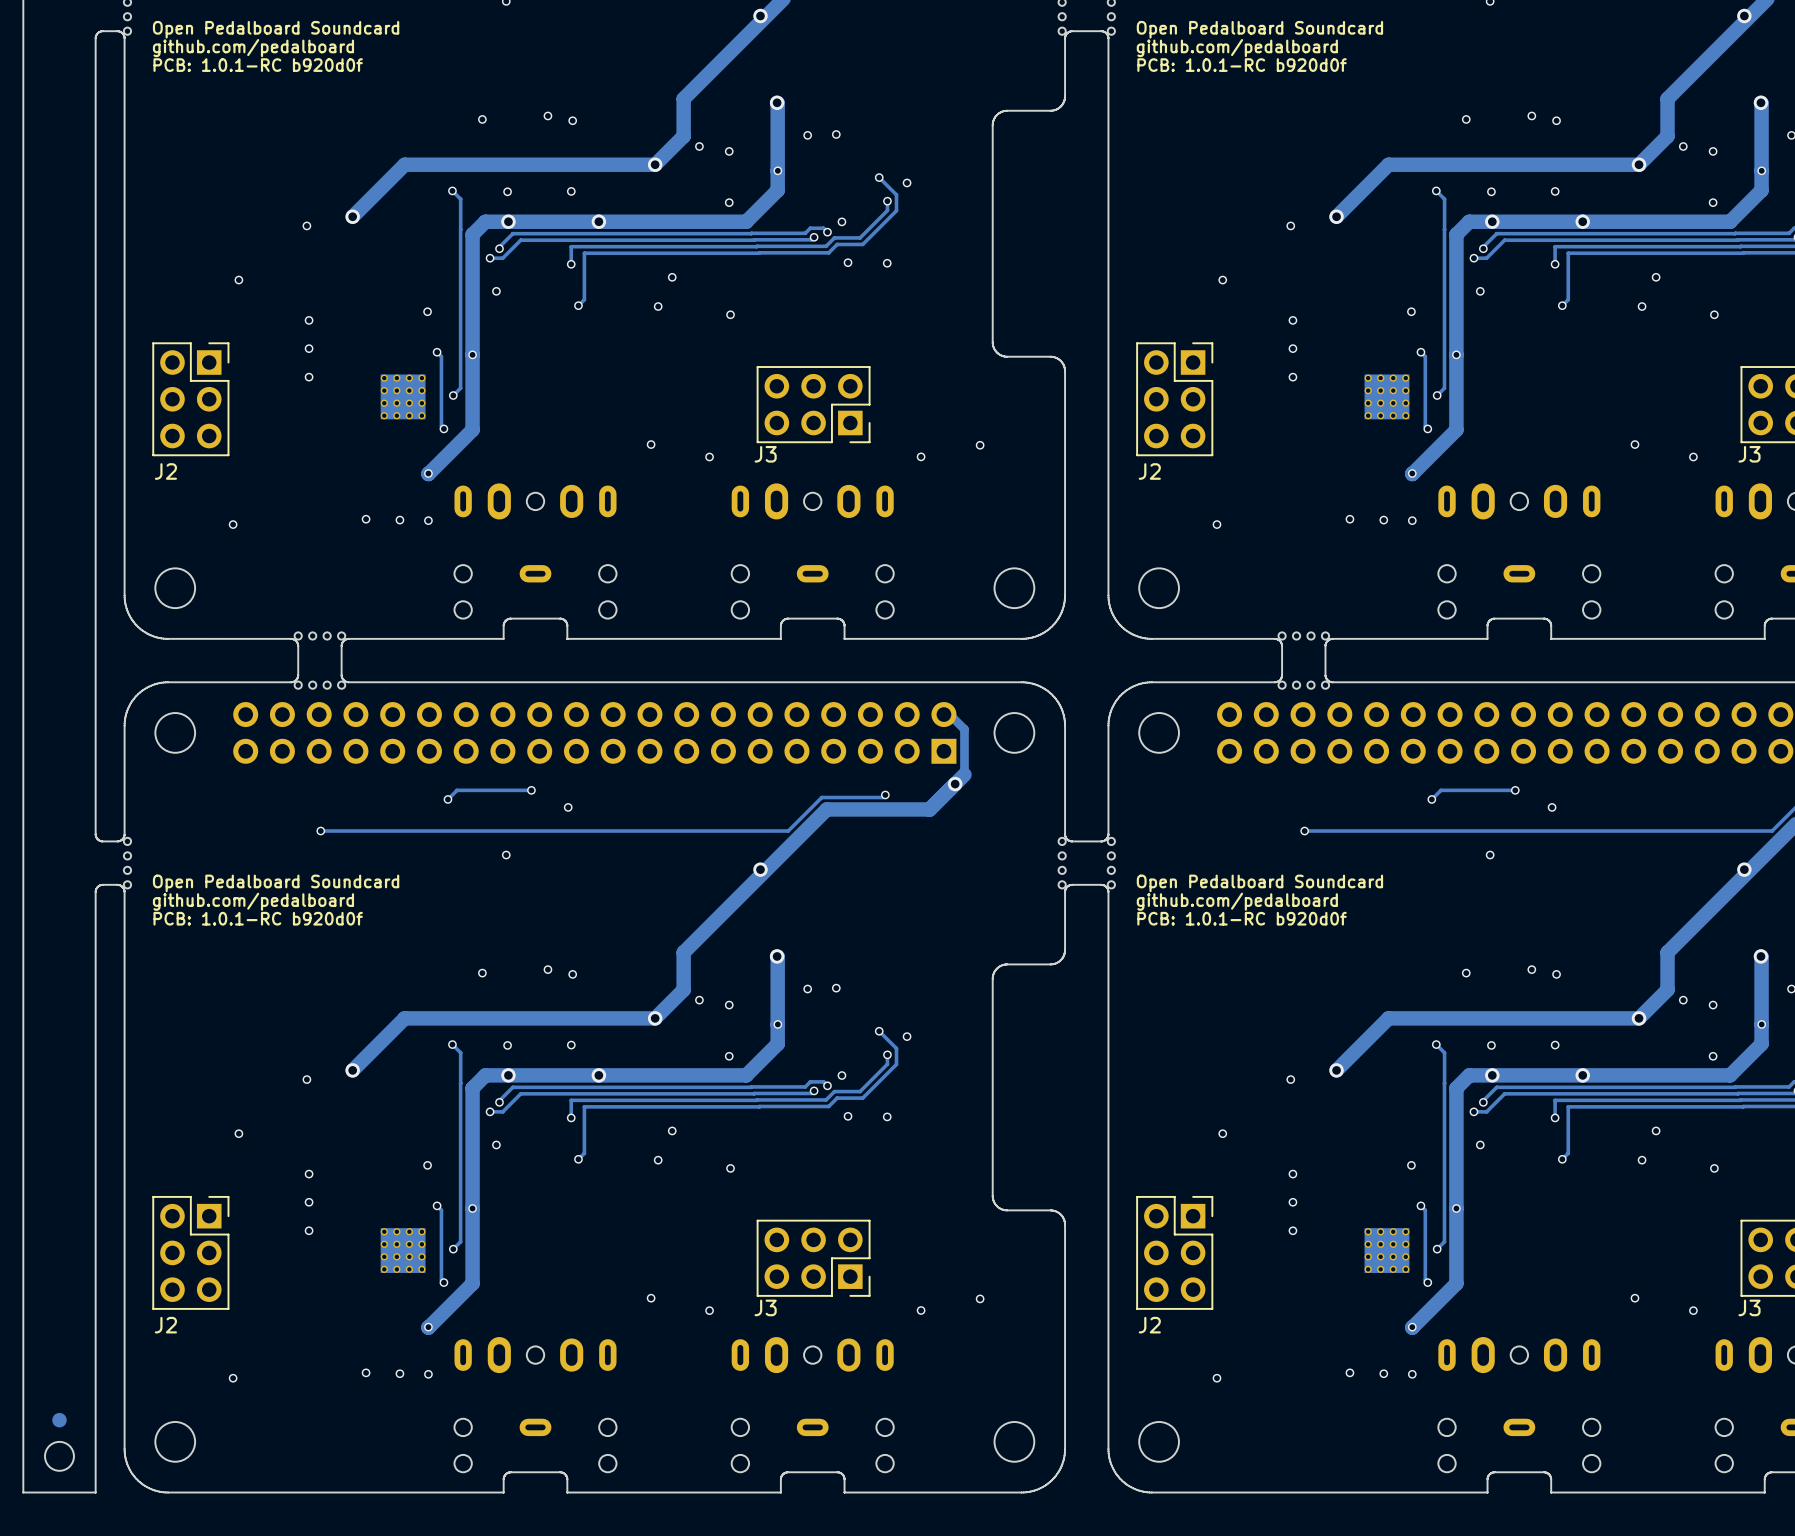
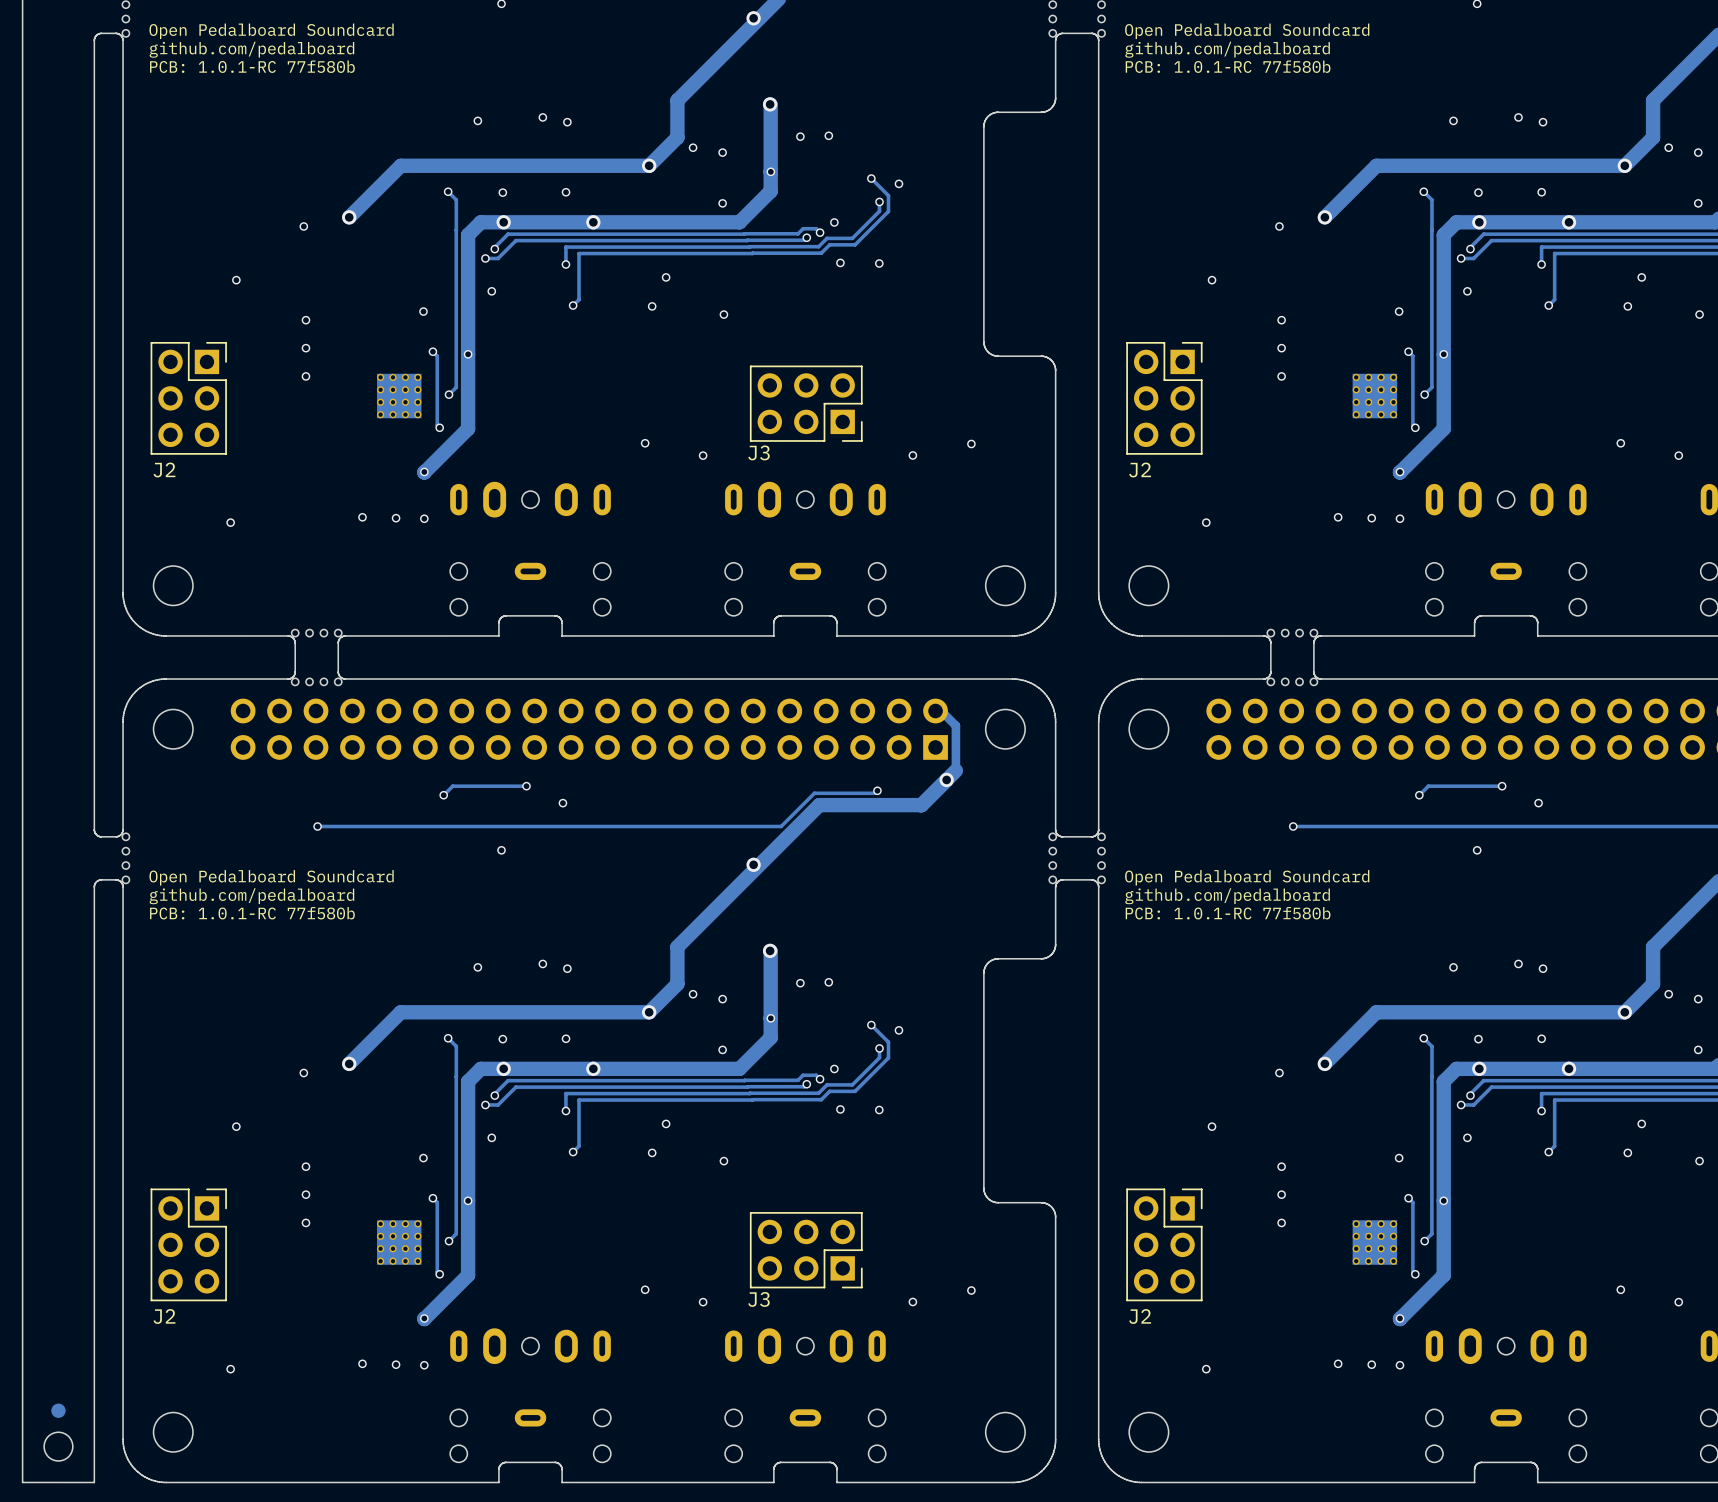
text: PCB: 1.0.1-RC b920d0f (258, 65) -> PCB: 1.0.1-RC 77f580b (252, 66)
text: PCB: 1.0.1-RC b920d0f (1242, 65) -> PCB: 1.0.1-RC 77f580b (1228, 66)
text: PCB: 1.0.1-RC b920d0f (258, 918) -> PCB: 1.0.1-RC 77f580b (252, 913)
text: PCB: 1.0.1-RC b920d0f (1242, 918) -> PCB: 1.0.1-RC 77f580b (1228, 913)

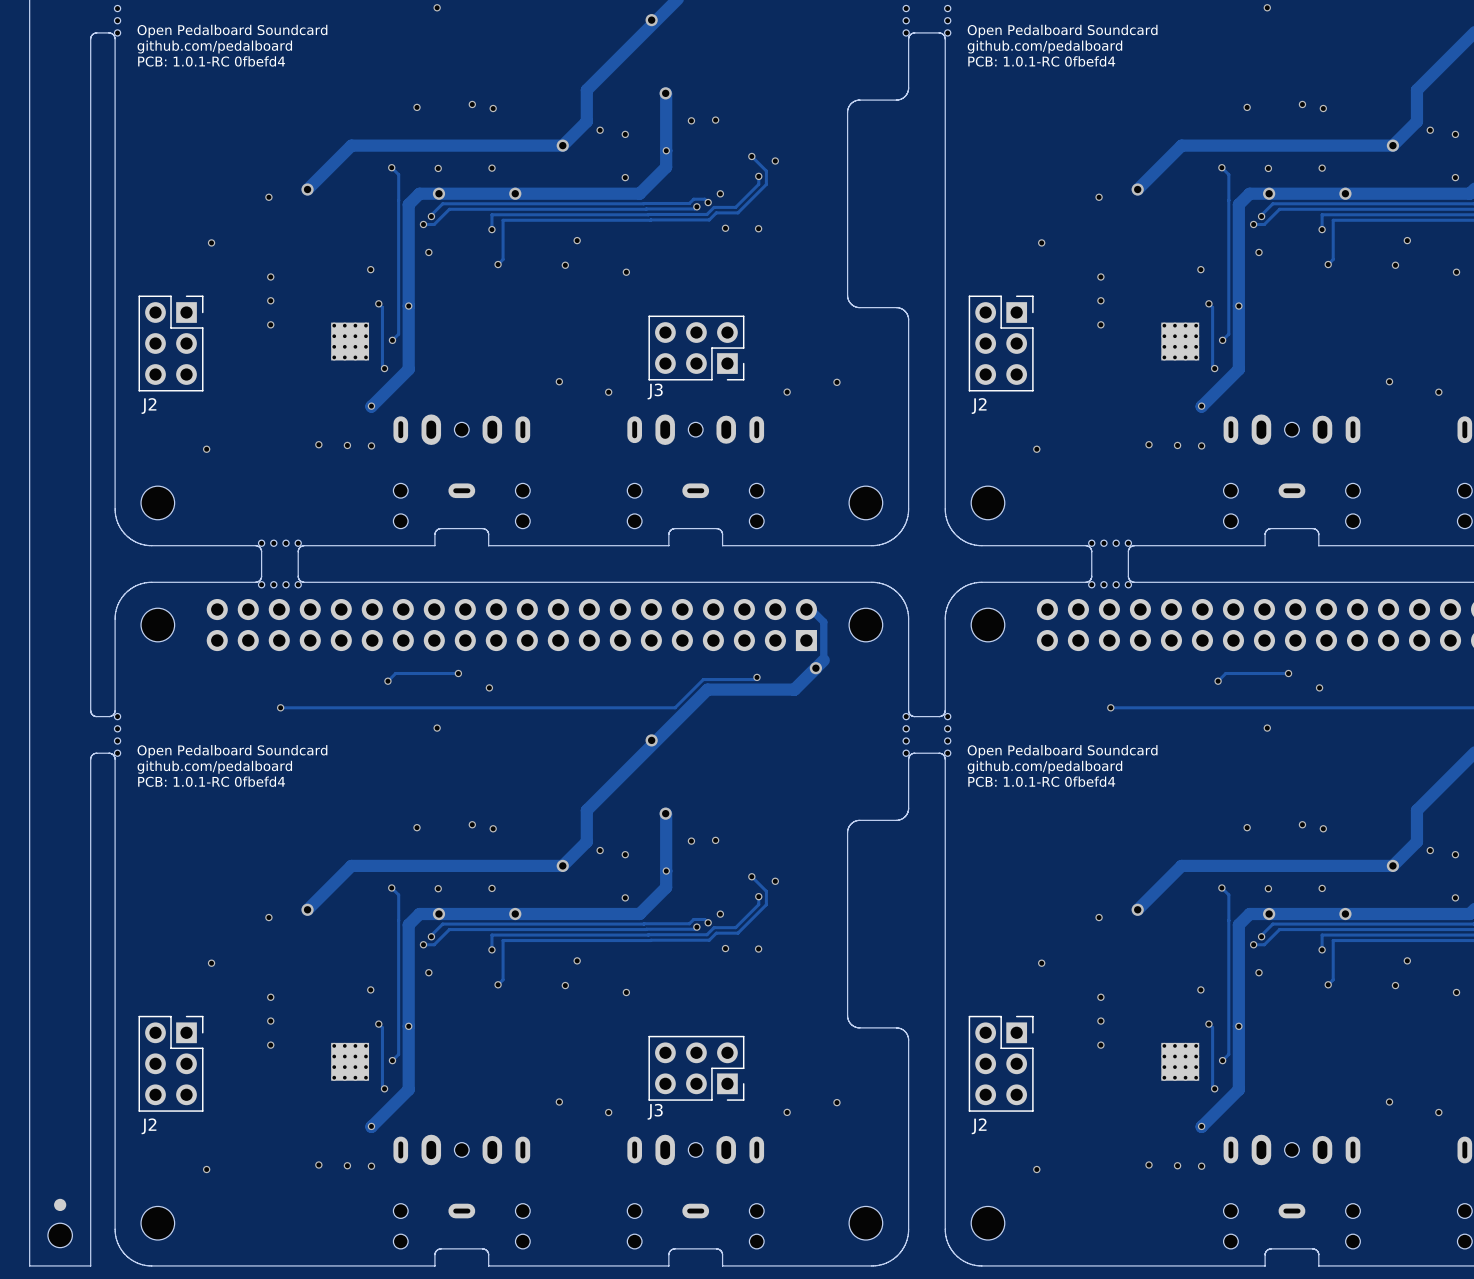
text: PCB: 1.0.1-RC 77f580b (252, 66) -> PCB: 1.0.1-RC 0fbefd4 (211, 61)
text: PCB: 1.0.1-RC 77f580b (1228, 66) -> PCB: 1.0.1-RC 0fbefd4 (1041, 61)
text: PCB: 1.0.1-RC 77f580b (252, 913) -> PCB: 1.0.1-RC 0fbefd4 (211, 781)
text: PCB: 1.0.1-RC 77f580b (1228, 913) -> PCB: 1.0.1-RC 0fbefd4 (1041, 781)

